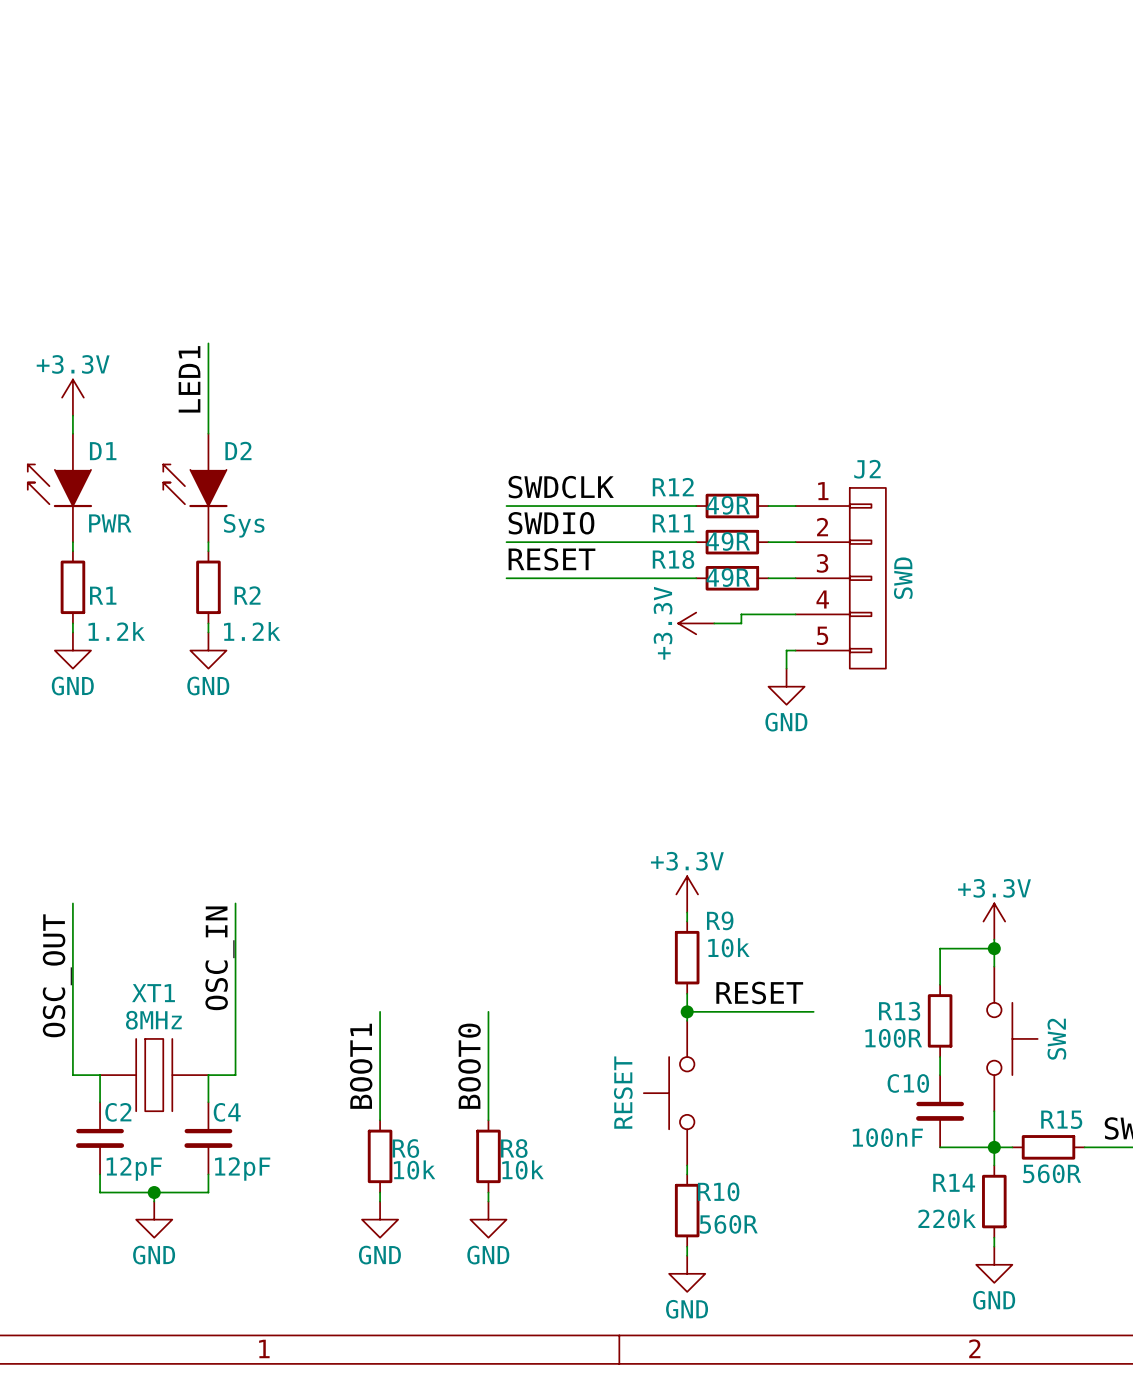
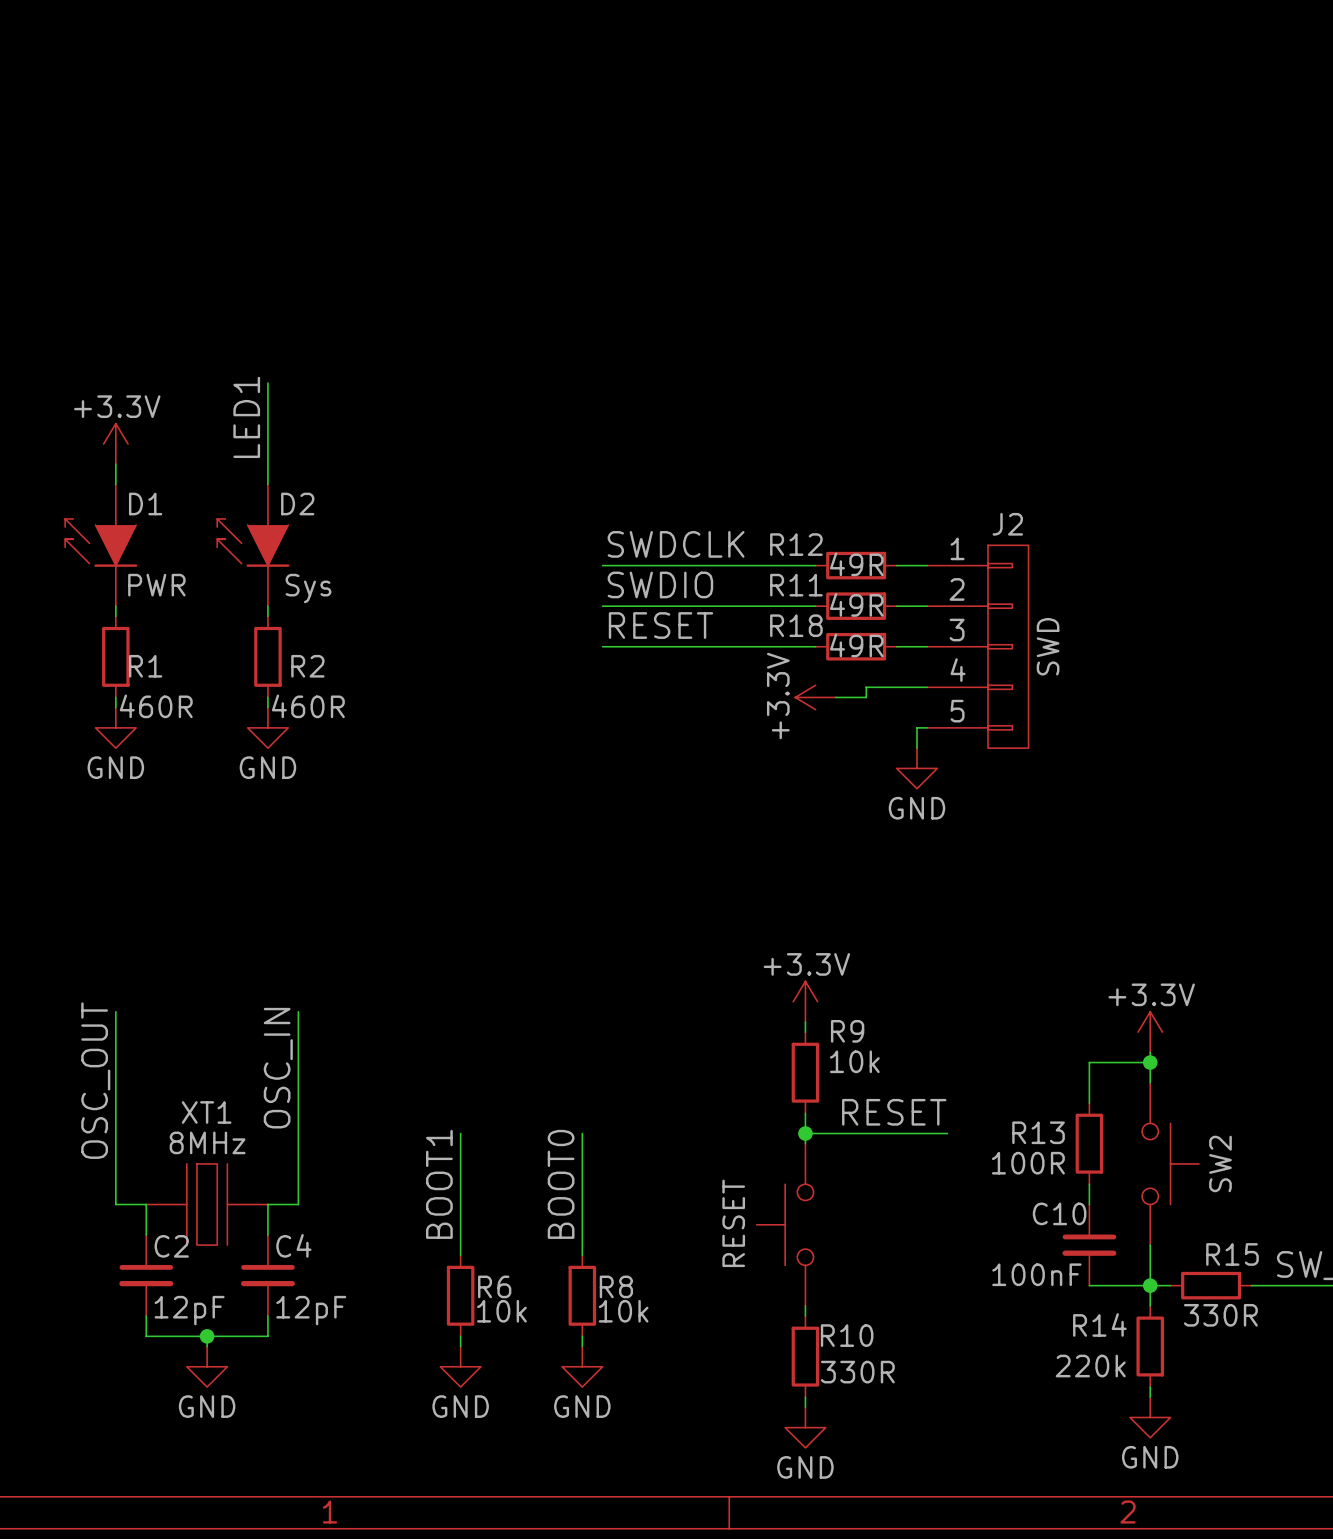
R1 value: 1.2k (116, 631) -> 460R (156, 706)
R2 value: 1.2k (252, 631) -> 460R (308, 706)
R15 value: 560R (1052, 1173) -> 330R (1220, 1315)
R10 value: 560R (728, 1224) -> 330R (857, 1372)

